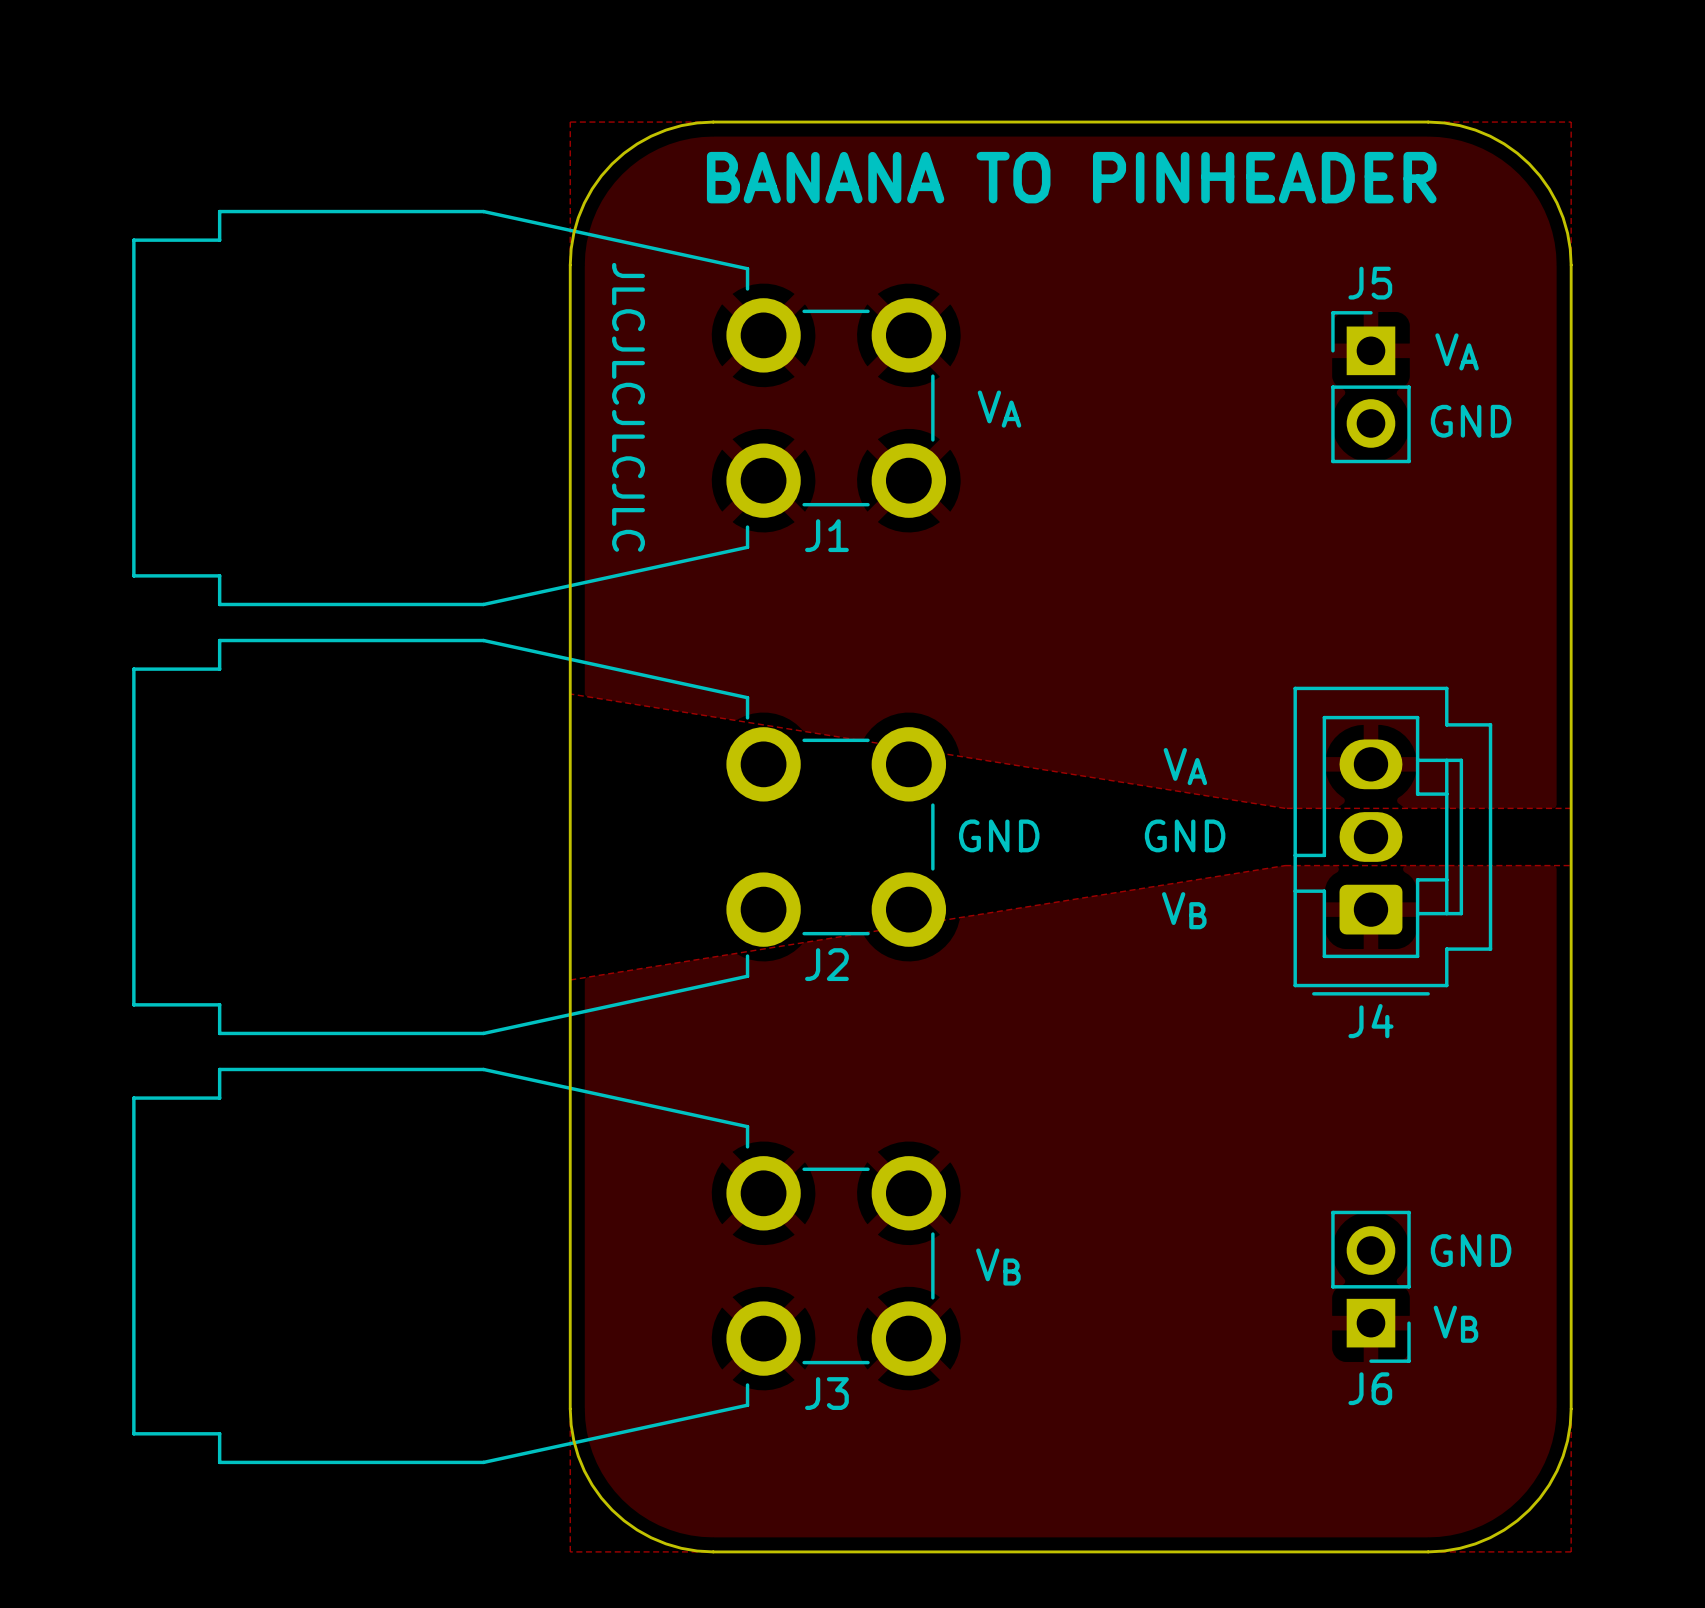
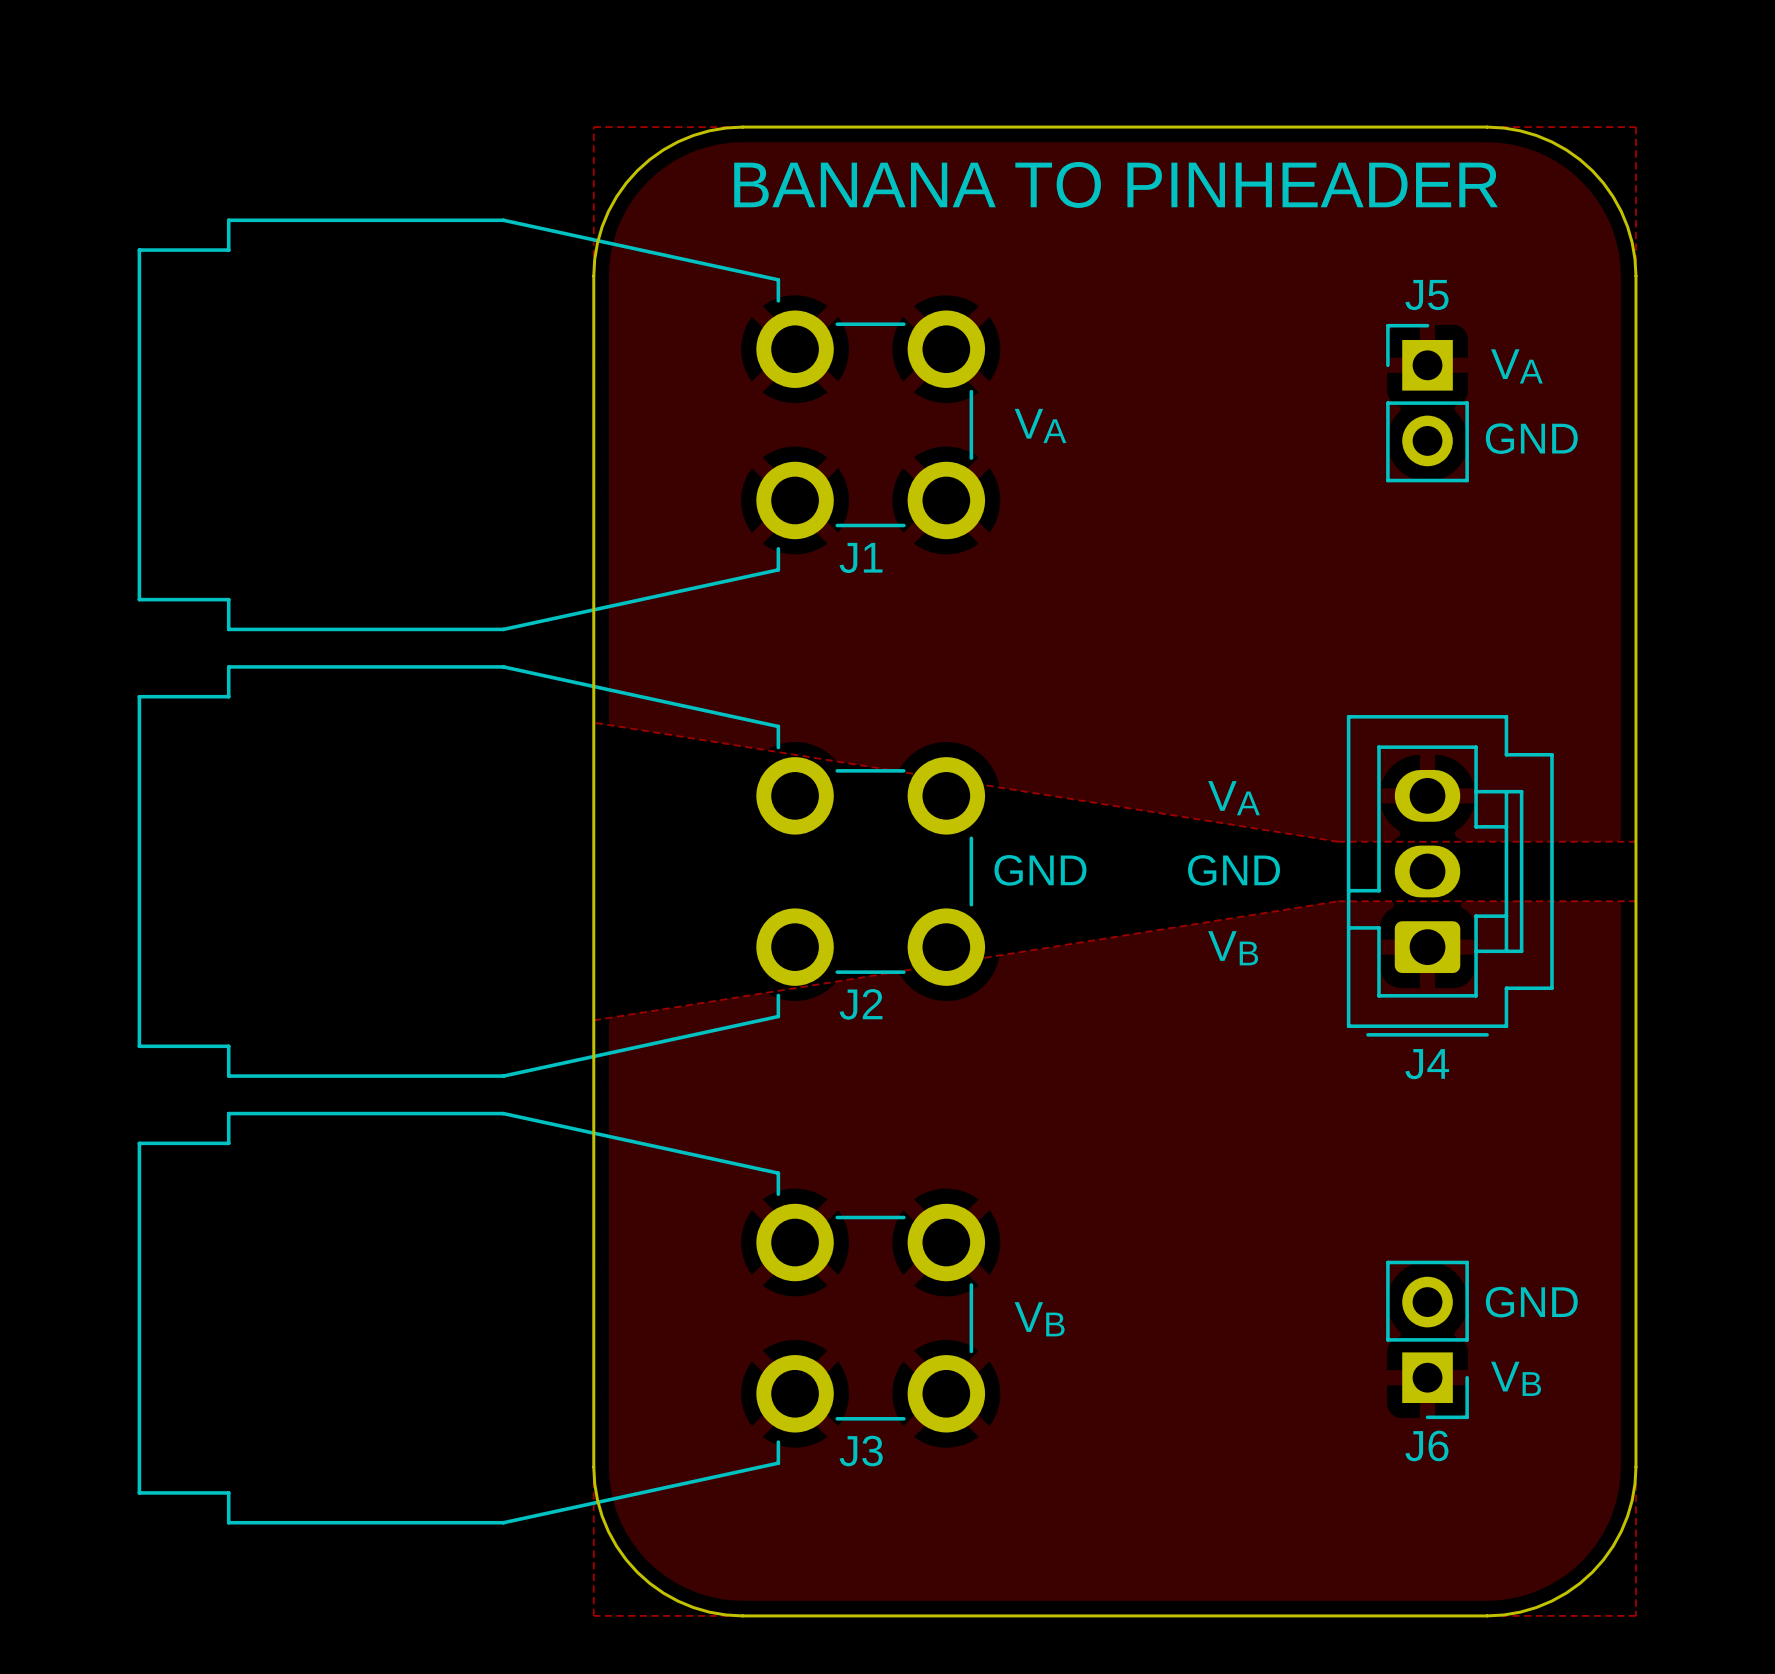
text: JLCJLCJLCJLC (628, 407) -> none

